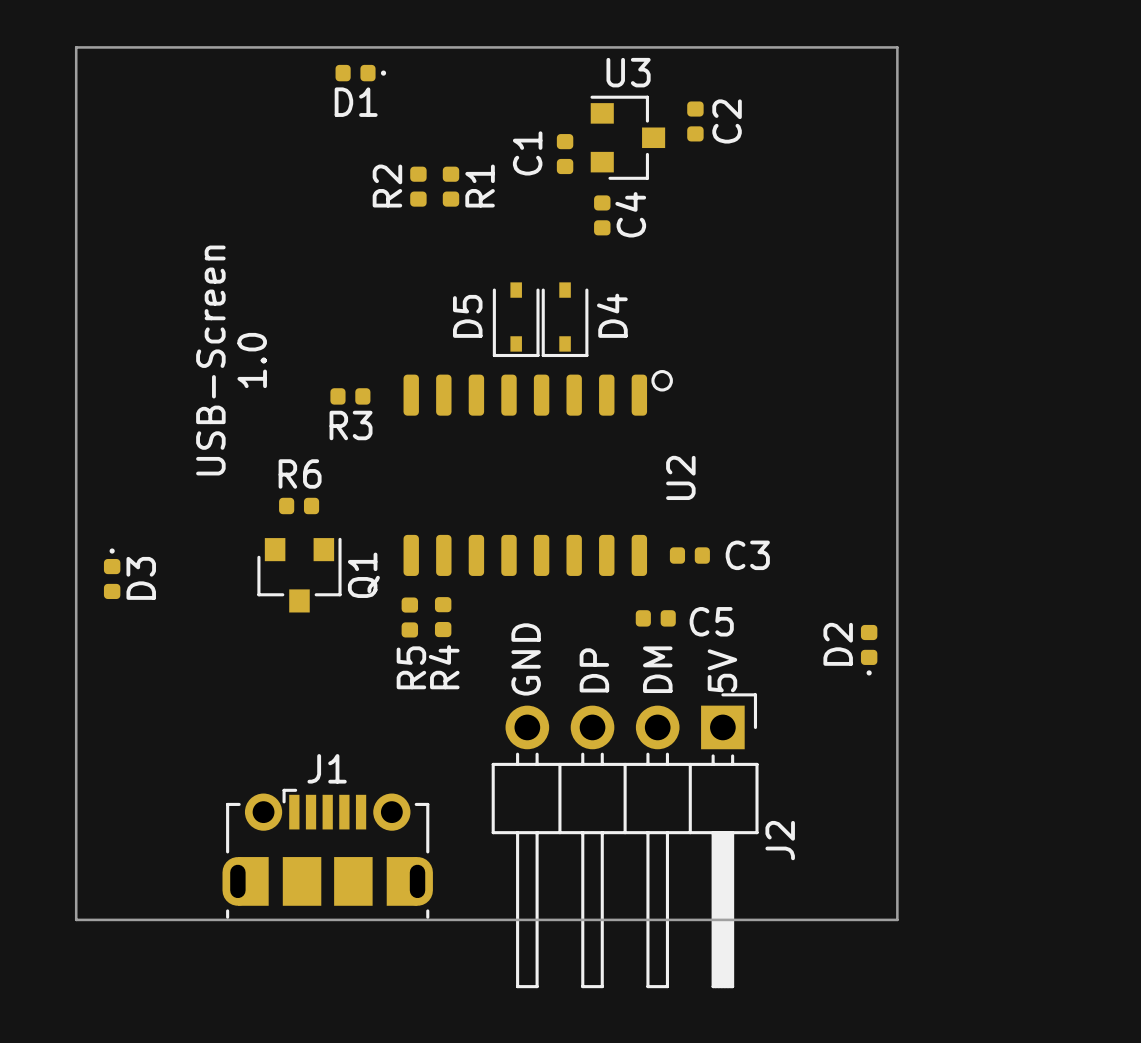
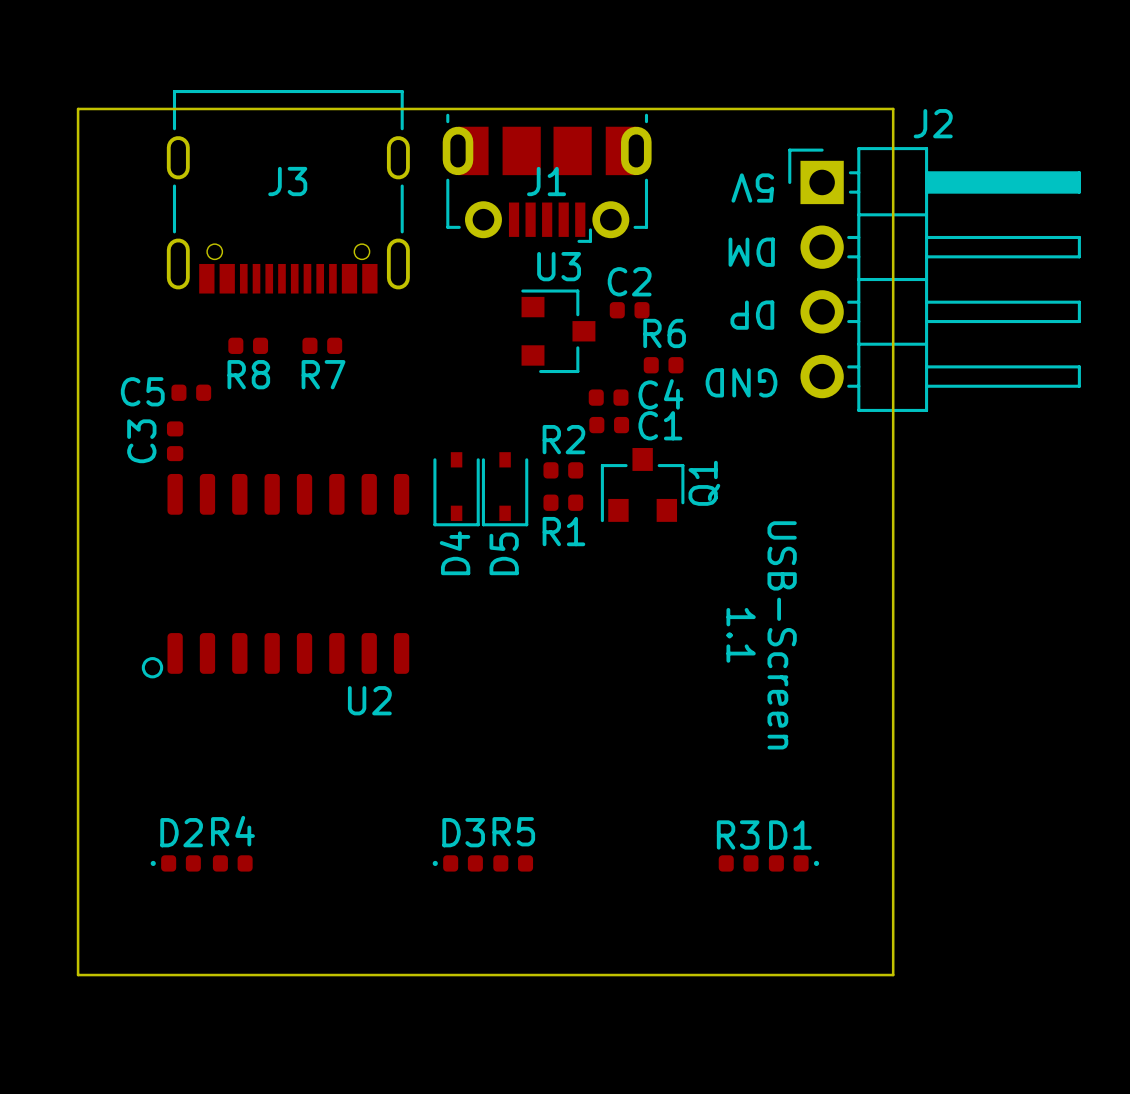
D1 position: (360, 73) -> (793, 863)
D1 name position: D1 (356, 102) -> D1 (790, 834)
C2 rotation: 0° (695, 121) -> 90° clockwise (629, 310)
C2 position: (695, 121) -> (629, 310)
J3: none -> (288, 191)
U3 position: (627, 137) -> (558, 331)
C1 name position: C1 (527, 153) -> C1 (660, 425)
C1 rotation: 0° (565, 154) -> 90° clockwise (609, 425)
C1 position: (565, 154) -> (609, 425)
R2 rotation: 0° (418, 186) -> 90° clockwise (563, 470)
R2 position: (418, 186) -> (563, 470)
R1 rotation: 0° (451, 186) -> 90° clockwise (563, 502)
R1 position: (451, 186) -> (563, 502)
C4 rotation: 0° (602, 215) -> 90° clockwise (608, 397)
C4 position: (602, 215) -> (608, 397)
R8: none -> (248, 345)
R7: none -> (322, 345)
D4 name position: D4 (612, 315) -> D4 (455, 553)
D5 name position: D5 (467, 316) -> D5 (504, 553)
D5 position: (516, 319) -> (505, 489)
D4 position: (565, 319) -> (456, 489)
text rotation: 0° (210, 360) -> 180° (782, 635)
text position: USB-Screen (210, 360) -> USB-Screen (782, 635)
text: 1.0 (252, 360) -> none
R3 position: (350, 396) -> (738, 863)
R3 name position: R3 (351, 425) -> R3 (738, 834)
U2 rotation: 0° (538, 472) -> 180° (275, 576)
U2 position: (538, 472) -> (275, 576)
U2 name position: U2 (680, 477) -> U2 (369, 700)
R6 position: (299, 505) -> (663, 365)
C3 rotation: 0° (689, 555) -> 90° clockwise (175, 441)
C3 position: (689, 555) -> (175, 441)
C3 name position: C3 (747, 555) -> C3 (141, 441)
D3 rotation: 0° (112, 573) -> 90° counterclockwise (457, 863)
D3 position: (112, 573) -> (457, 863)
Q1 rotation: 0° (299, 575) -> 180° (642, 485)
Q1 position: (299, 575) -> (642, 485)
text: none -> 1.1 (741, 635)
R5 rotation: 0° (409, 617) -> 90° clockwise (513, 863)
R5 position: (409, 617) -> (513, 863)
R4 rotation: 0° (443, 617) -> 90° clockwise (232, 863)
R4 position: (443, 617) -> (232, 863)
C5 position: (655, 618) -> (191, 392)
C5 name position: C5 (711, 621) -> C5 (142, 391)
D2 rotation: 0° (869, 650) -> 90° clockwise (175, 863)
D2 position: (869, 650) -> (175, 863)
text rotation: 0° (526, 659) -> 90° counterclockwise (741, 382)
text position: GND (526, 659) -> GND (741, 382)
R5 name position: R5 (411, 667) -> R5 (513, 831)
R4 name position: R4 (444, 667) -> R4 (232, 831)
text rotation: 0° (657, 669) -> 90° counterclockwise (751, 252)
text position: DM (657, 669) -> DM (751, 252)
text rotation: 0° (594, 670) -> 90° counterclockwise (752, 315)
text position: DP (594, 670) -> DP (752, 315)
text rotation: 0° (722, 670) -> 90° counterclockwise (752, 188)
text position: 5V (722, 670) -> 5V (752, 188)
J1 name position: J1 (327, 768) -> J1 (546, 181)
J2 rotation: 0° (625, 840) -> 90° counterclockwise (934, 279)
J2 position: (625, 840) -> (934, 279)
J1 rotation: 0° (327, 853) -> 180° (547, 178)
J1 position: (327, 853) -> (547, 178)

